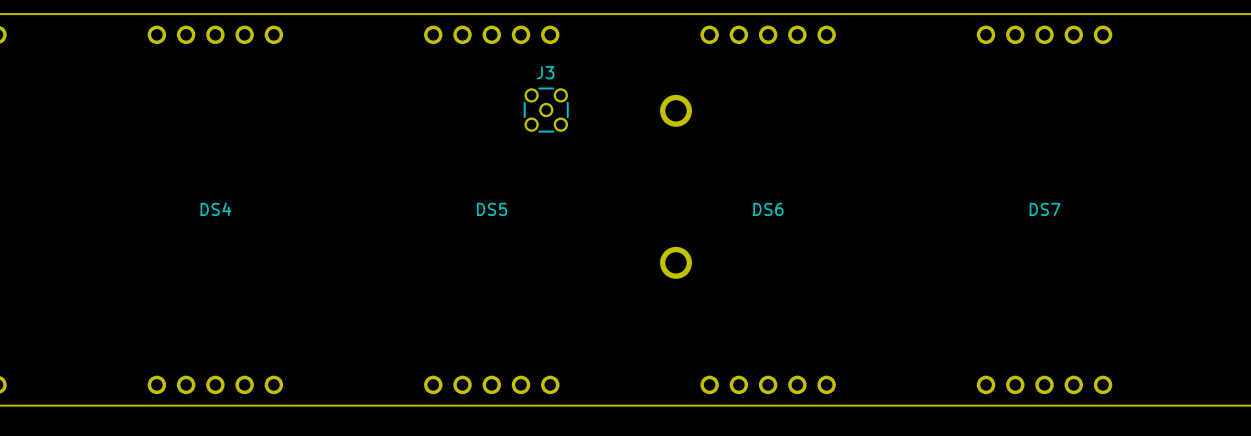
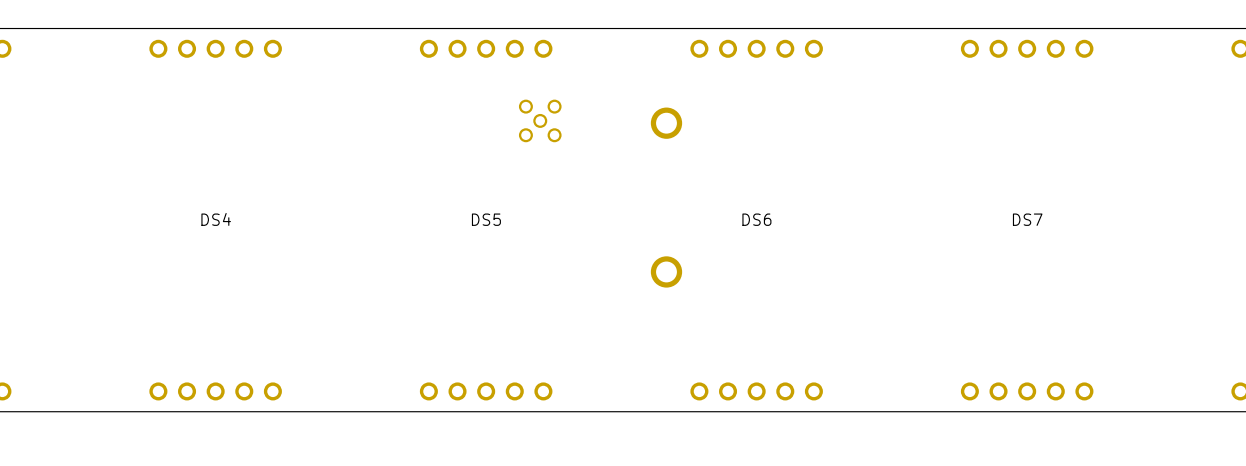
J3 side: top (546, 110) -> bottom (540, 120)

